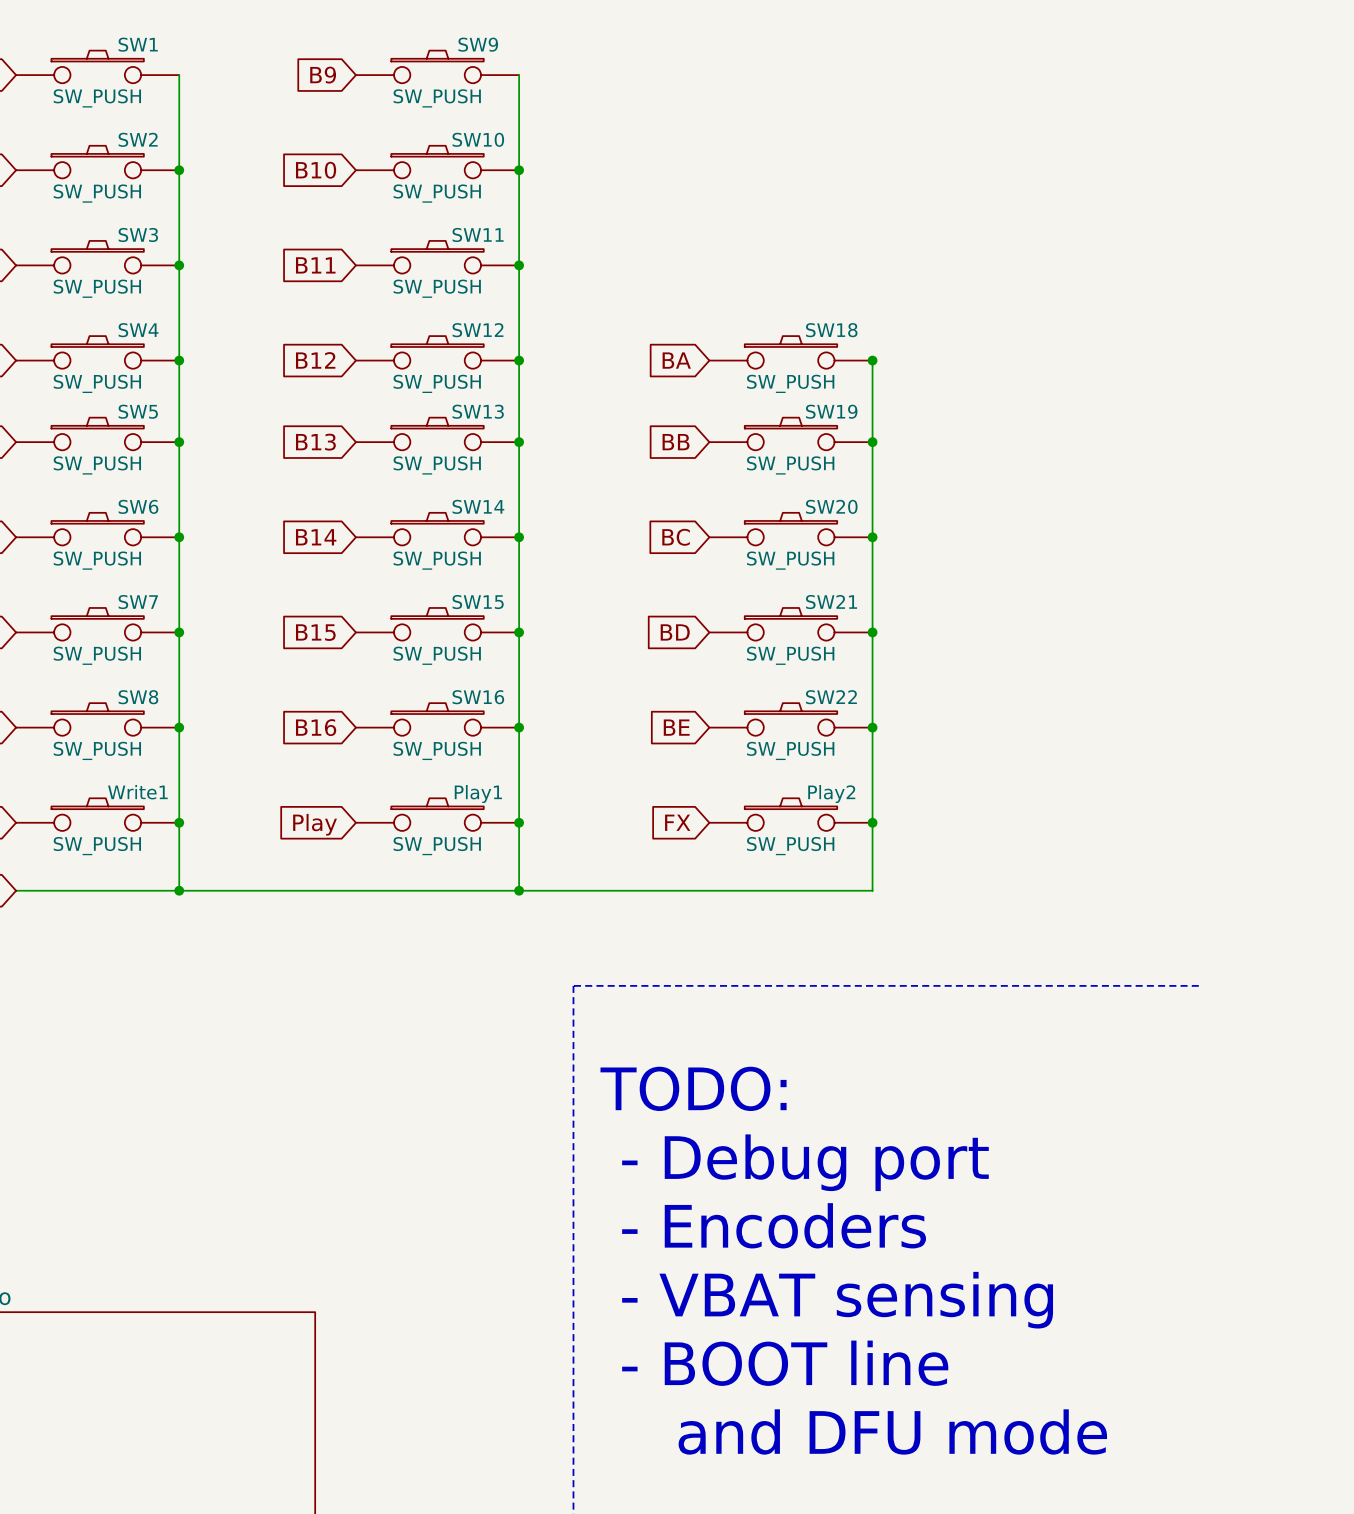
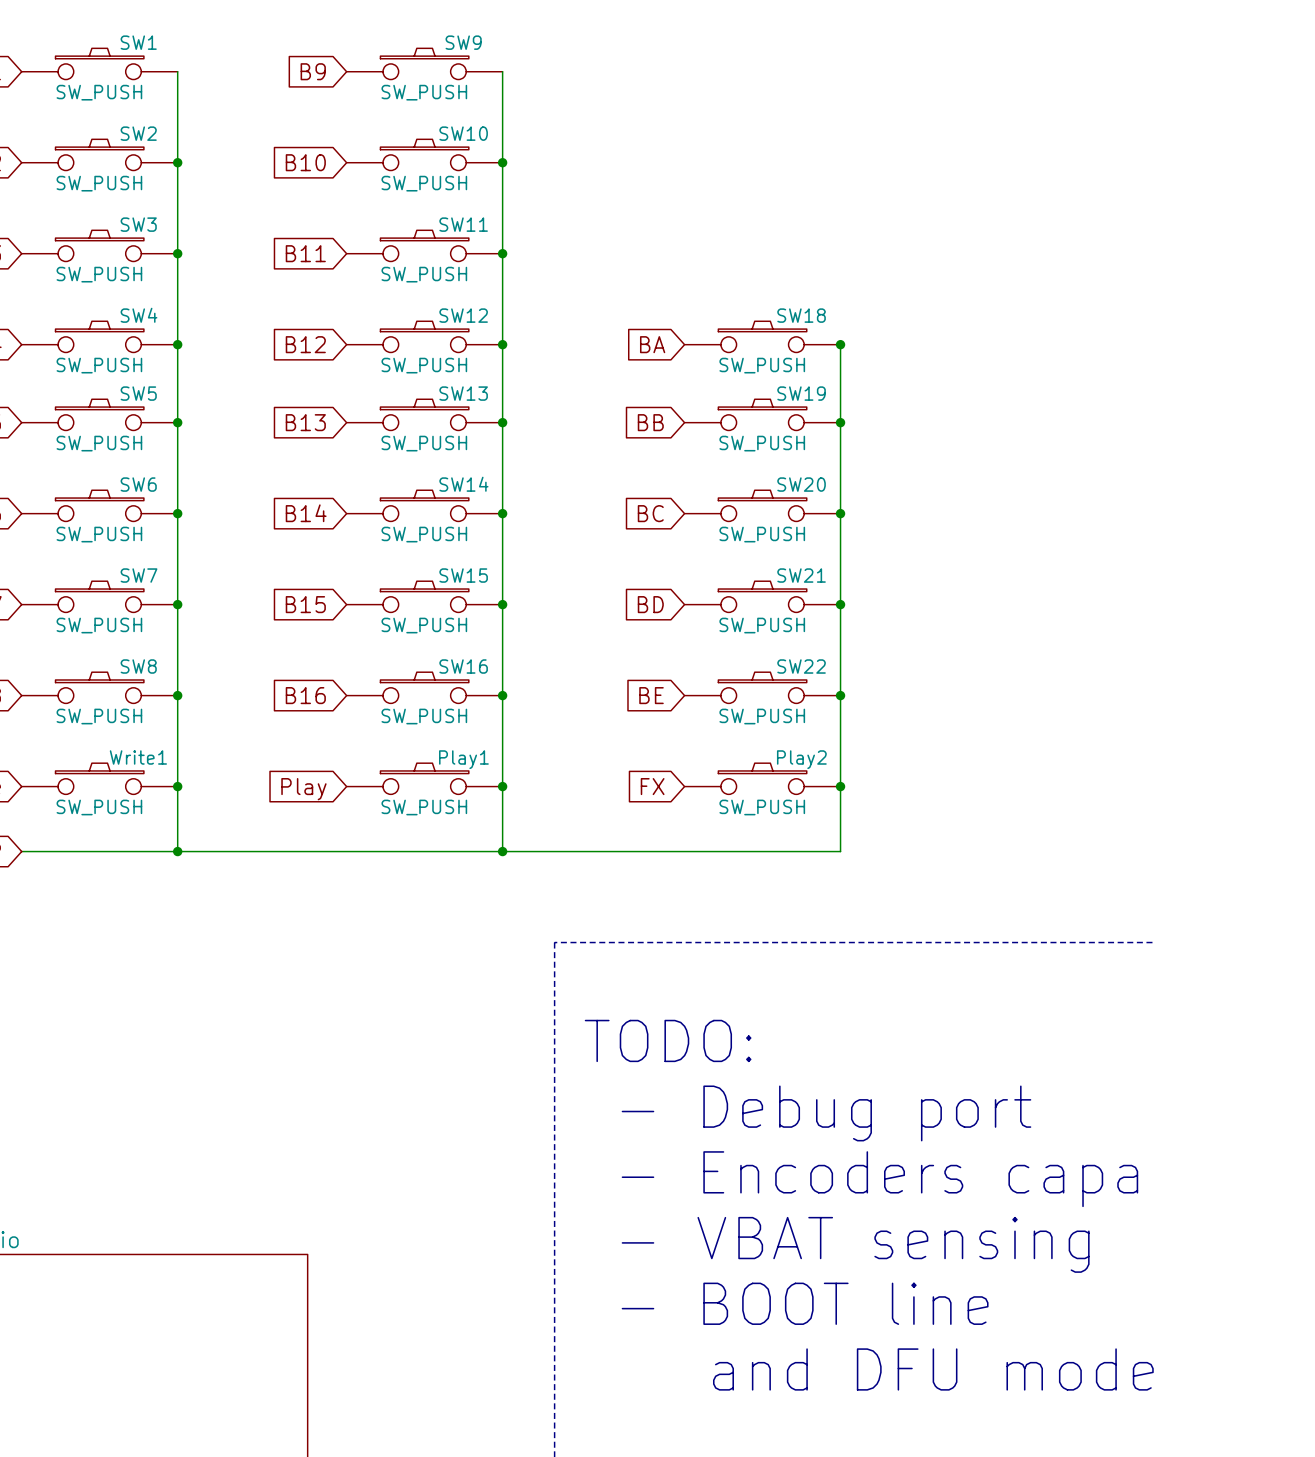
text: - Encoders (774, 1225) -> - Encoders capa (879, 1179)

